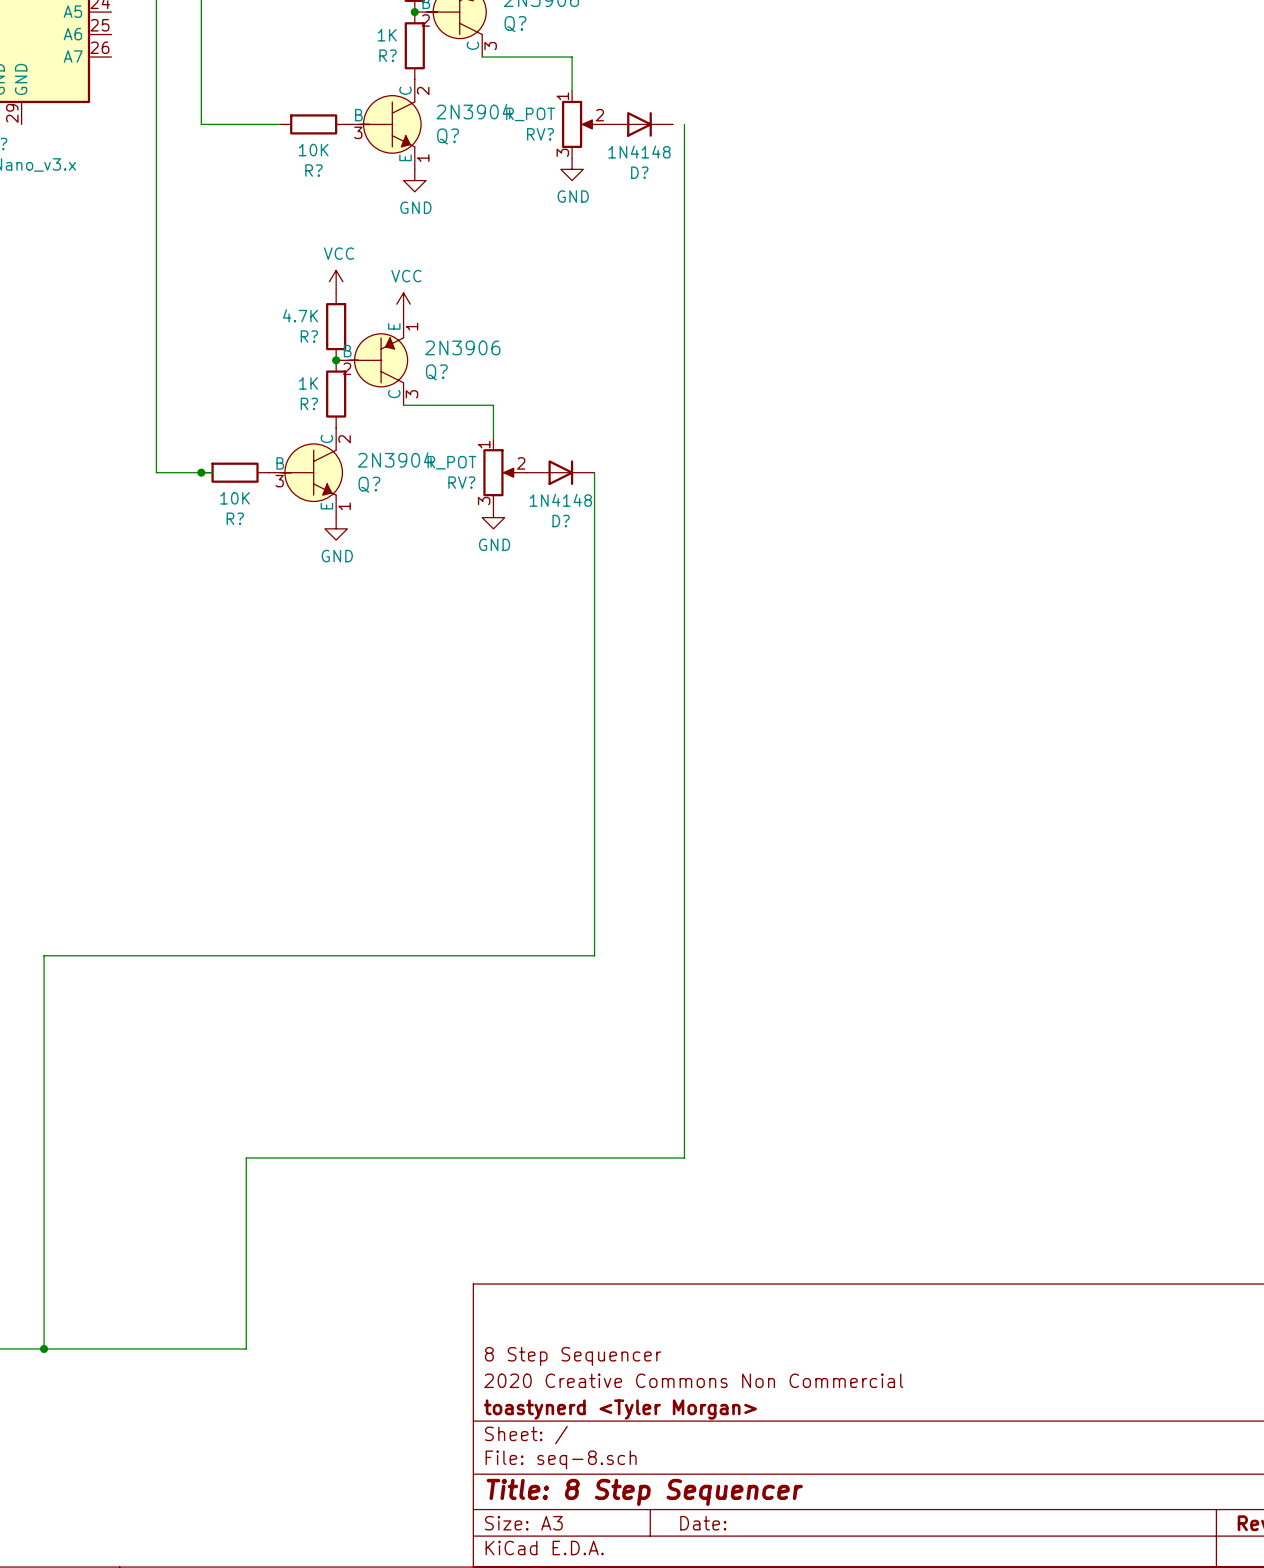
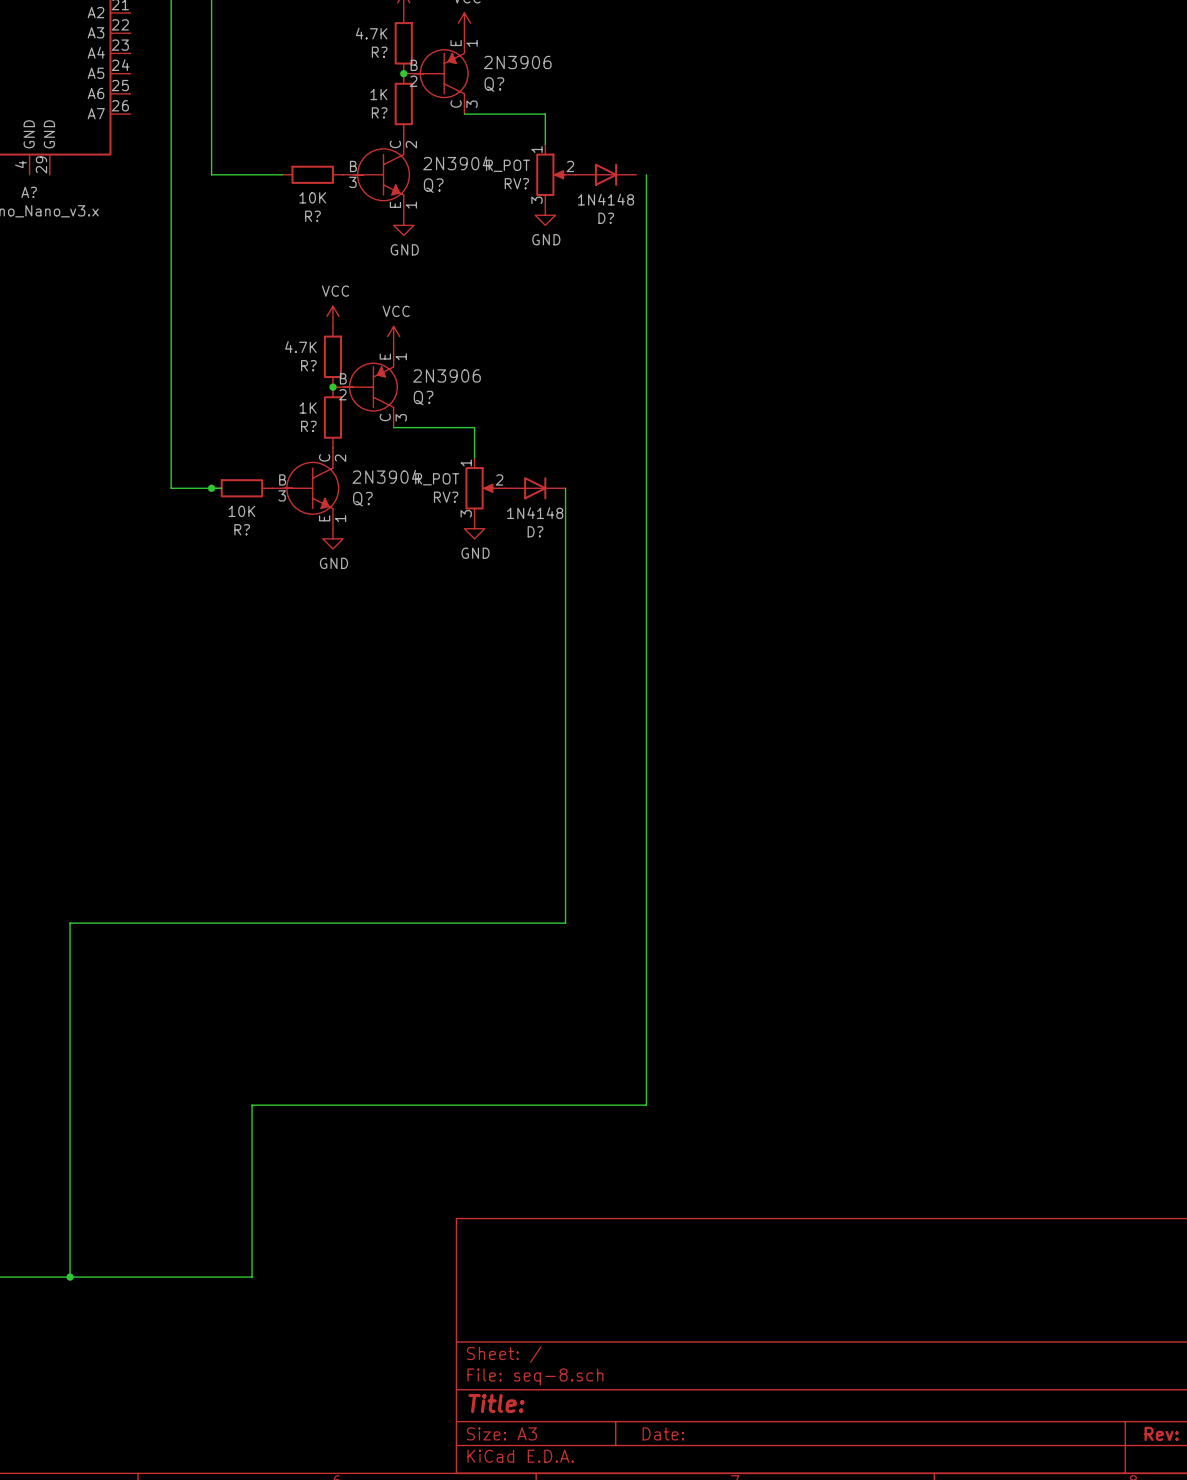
title block: 8 Step Sequencer (573, 1356) -> none
title block: 2020 Creative Commons Non Commercial (693, 1380) -> none
title block: toastynerd <Tyler Morgan> (620, 1409) -> none
title block: Title: 8 Step Sequencer (644, 1492) -> Title: (496, 1403)

